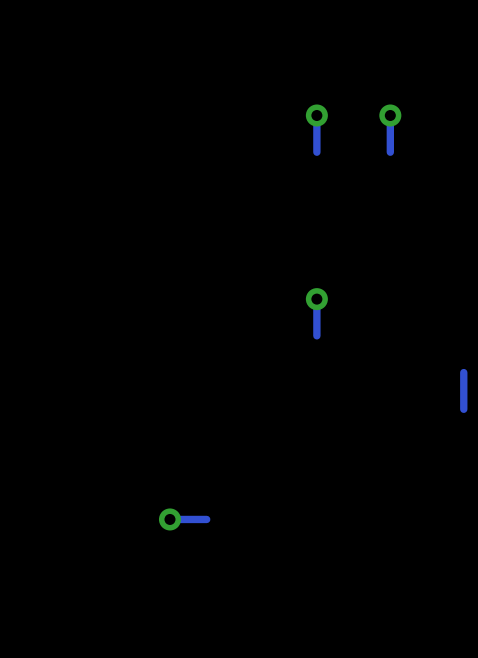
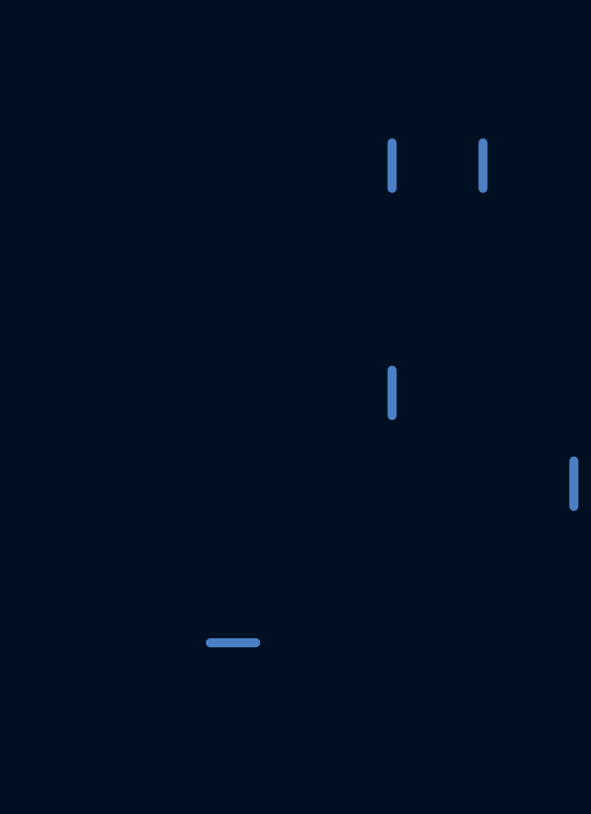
via: (316, 115) -> none
via: (390, 115) -> none
via: (316, 299) -> none
via: (169, 519) -> none

